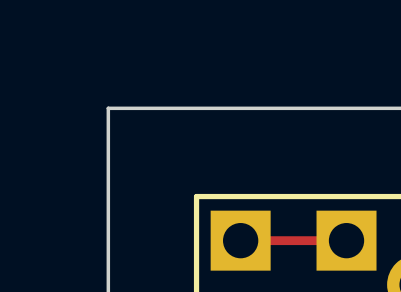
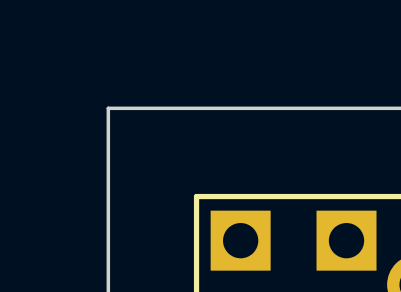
track: (240, 240) (346, 240) -> none

